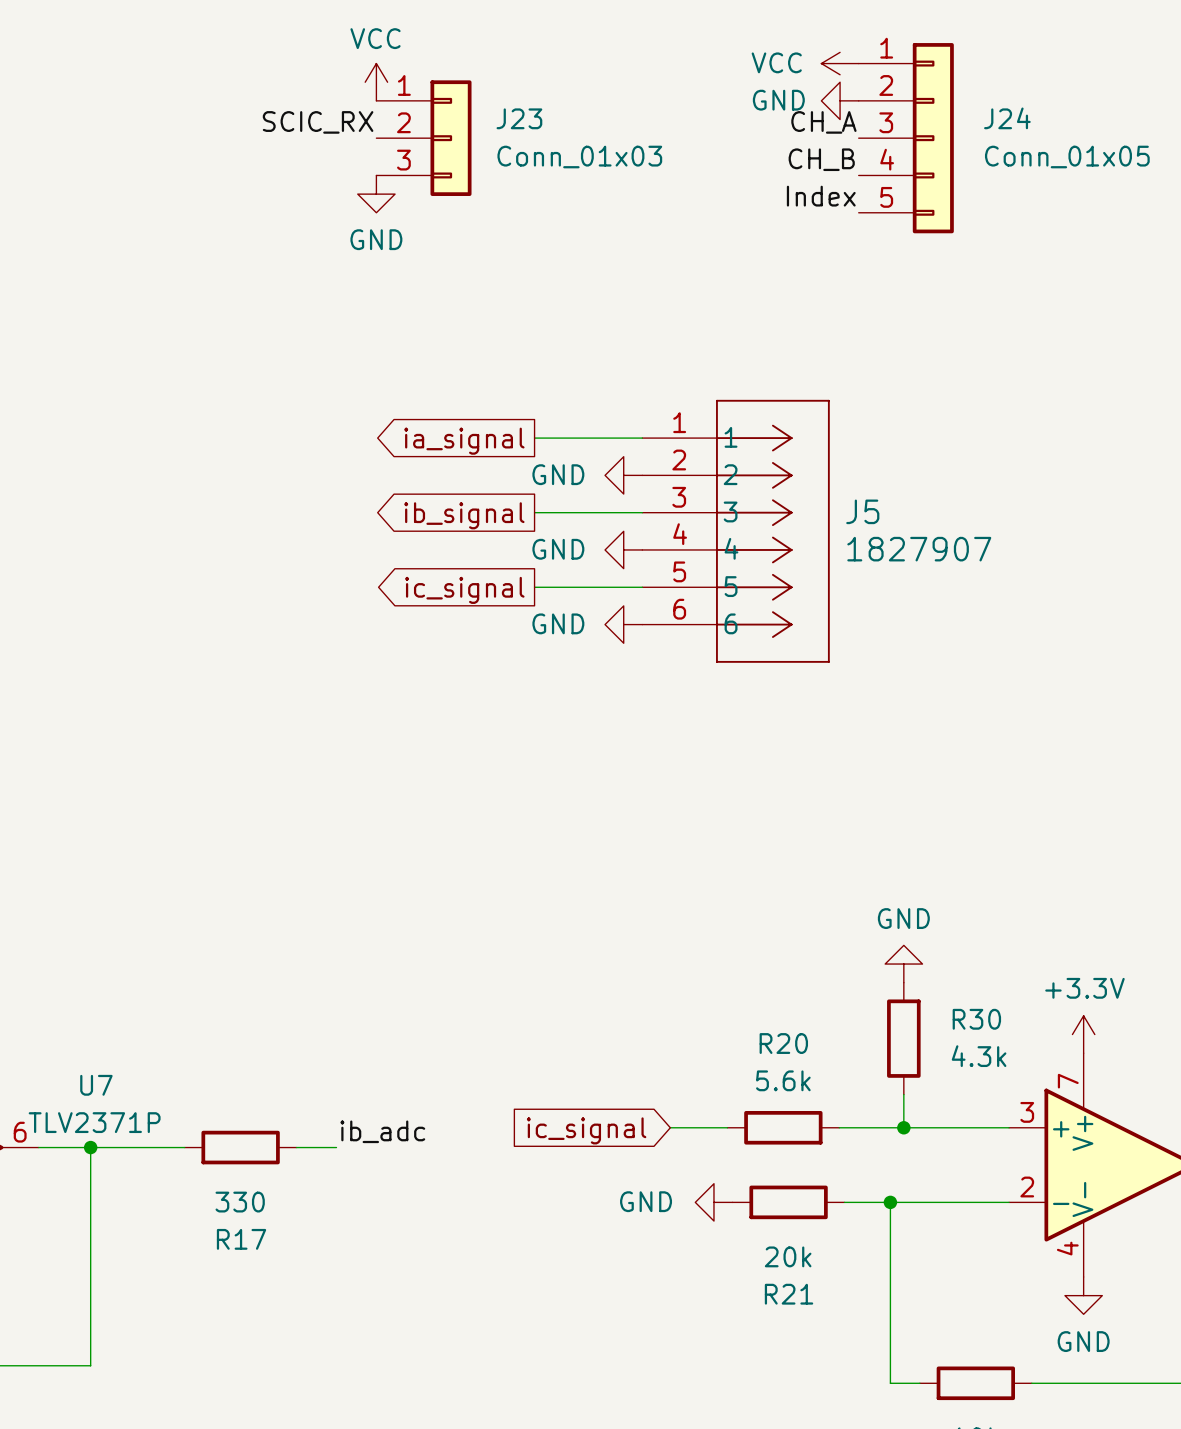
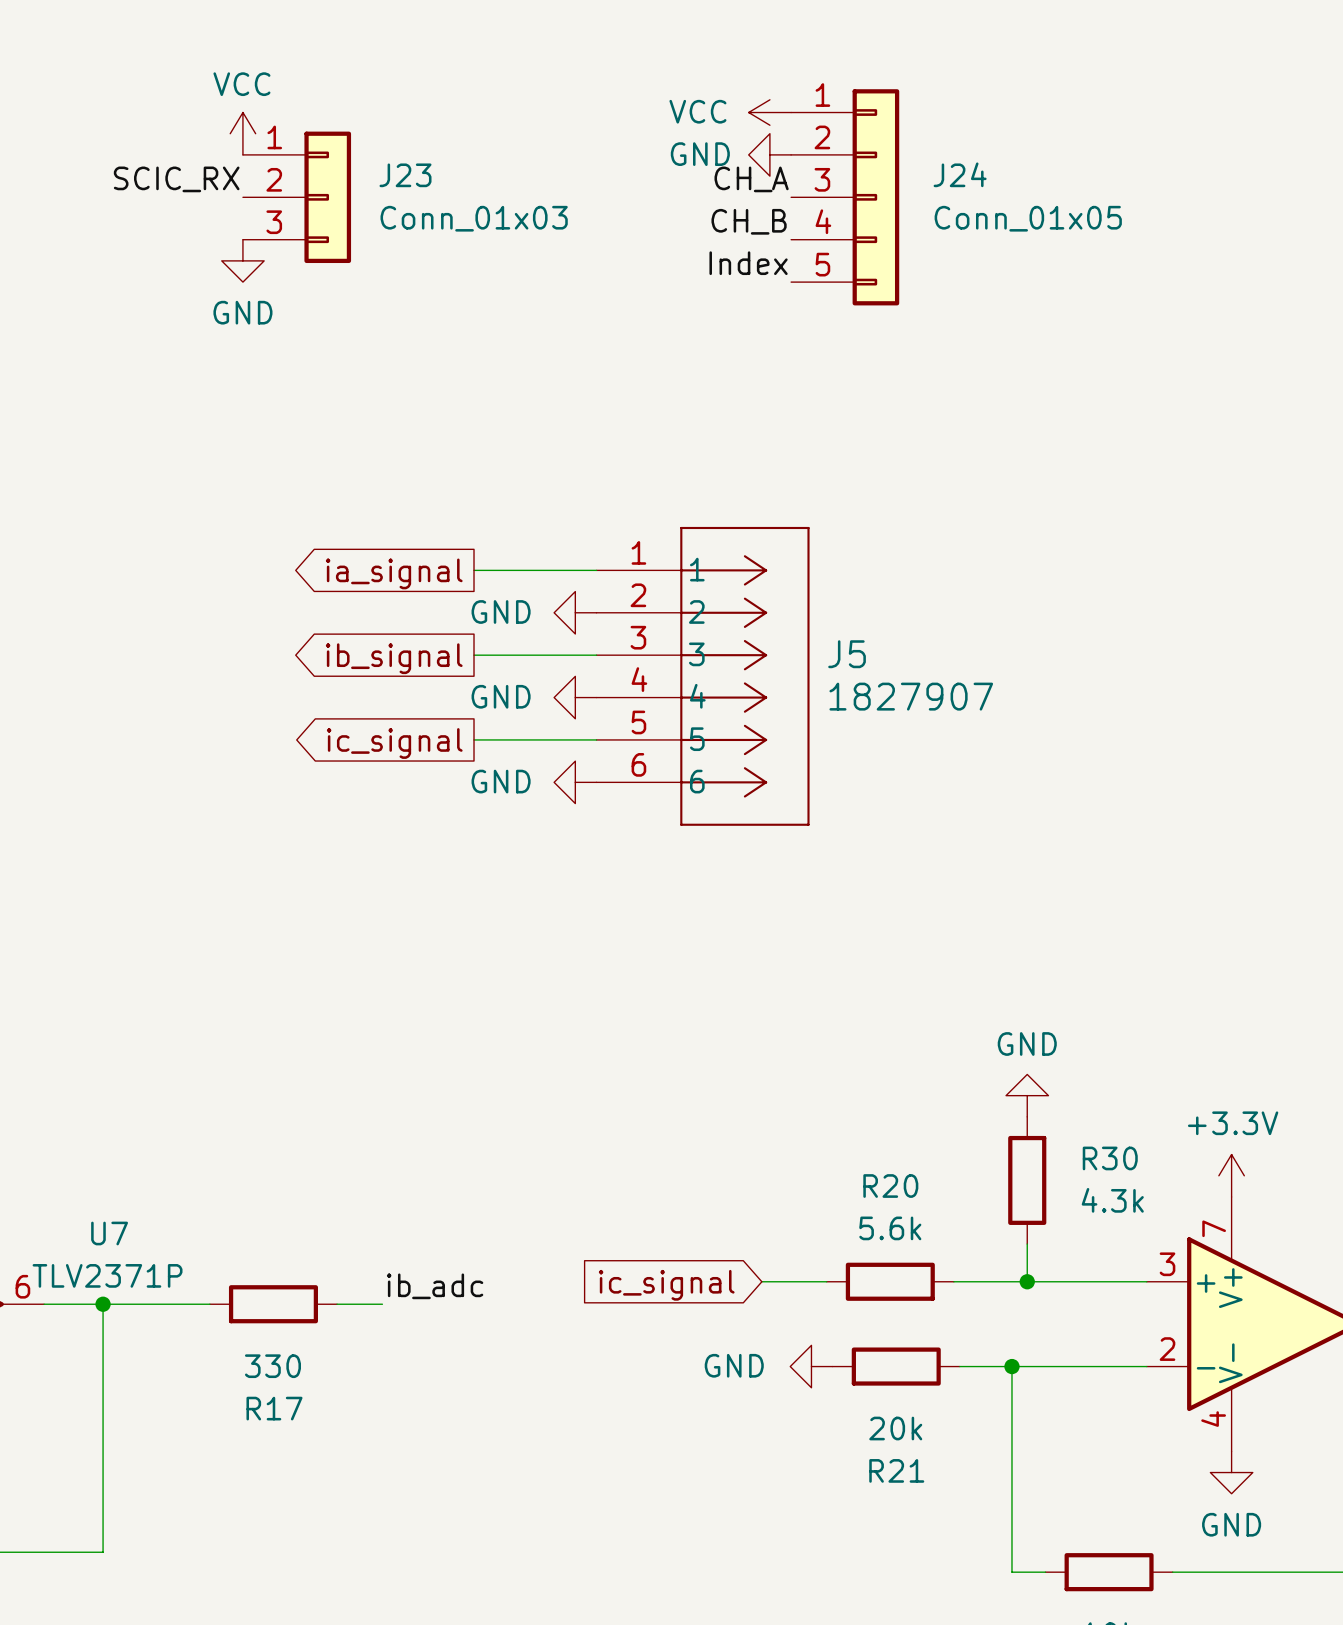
power symbol: VCC (840, 63) -> none
power symbol: VCC (376, 82) -> none
power symbol: none -> VCC (769, 112)
power symbol: GND (840, 100) -> none
power symbol: none -> VCC (242, 133)
label position: SCIC_RX (318, 122) -> SCIC_RX (176, 179)
label position: CH_A (823, 122) -> CH_A (751, 179)
power symbol: none -> GND (769, 154)
J23 position: (423, 138) -> (297, 197)
J24 position: (906, 138) -> (845, 197)
label position: CH_B (821, 159) -> CH_B (749, 221)
power symbol: GND (376, 194) -> none
label position: Index (821, 196) -> Index (748, 263)
power symbol: none -> GND (242, 260)
wire: (534, 438) (642, 438) -> (474, 570) (596, 570)
global label position: ia_signal (464, 441) -> ia_signal (394, 573)
power symbol: GND (623, 475) -> none
wire: (534, 512) (642, 512) -> (474, 655) (596, 655)
global label position: ib_signal (464, 515) -> ib_signal (394, 658)
J5 position: (736, 531) -> (703, 676)
power symbol: none -> GND (575, 612)
power symbol: GND (623, 549) -> none
wire: (534, 587) (642, 587) -> (474, 739) (596, 739)
global label position: ic_signal (464, 590) -> ic_signal (394, 743)
power symbol: none -> GND (575, 697)
power symbol: GND (623, 624) -> none
power symbol: none -> GND (575, 782)

